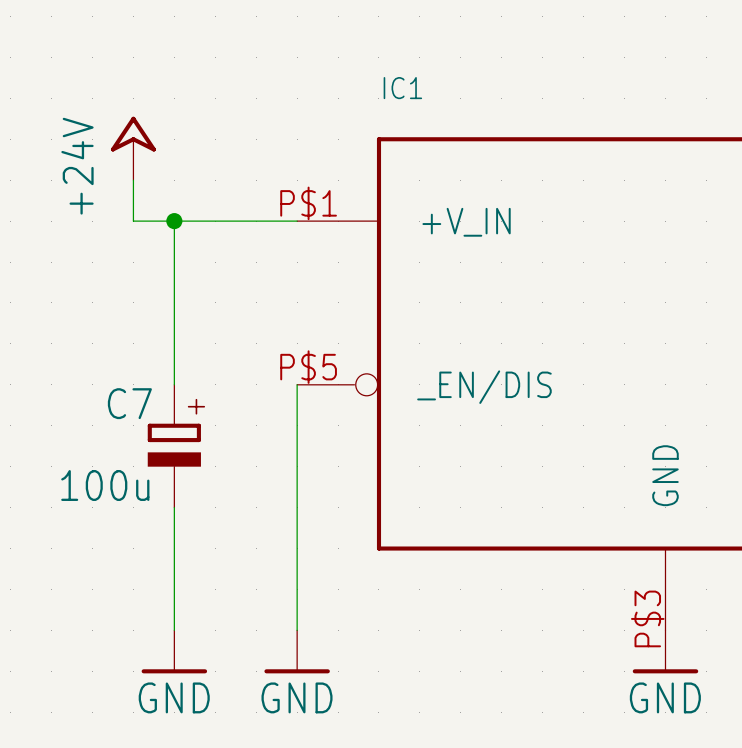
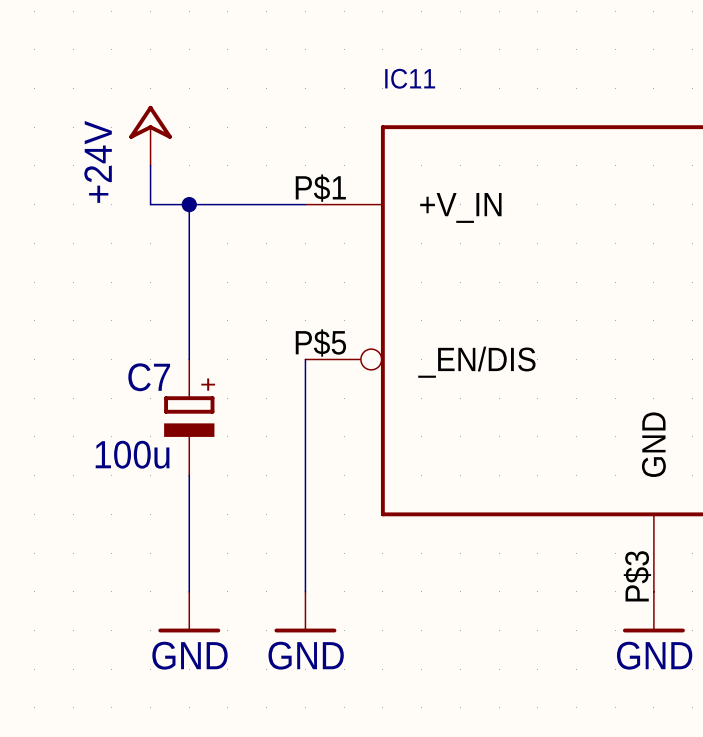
IC1 name: IC1 (402, 88) -> IC11 (410, 78)

